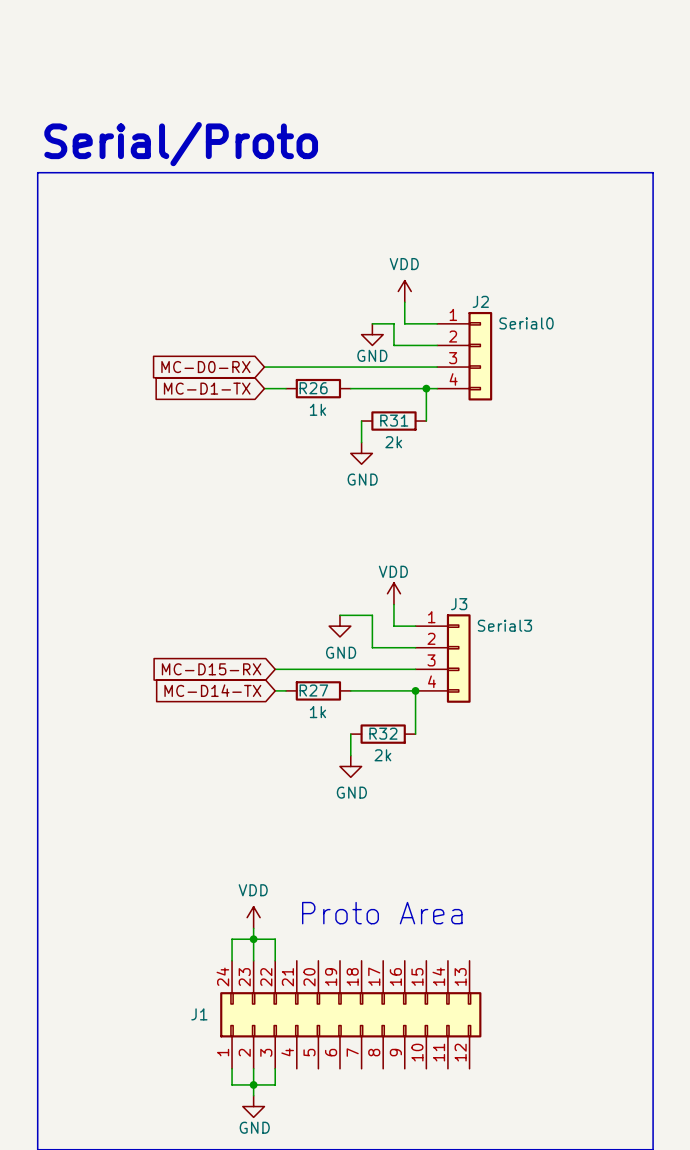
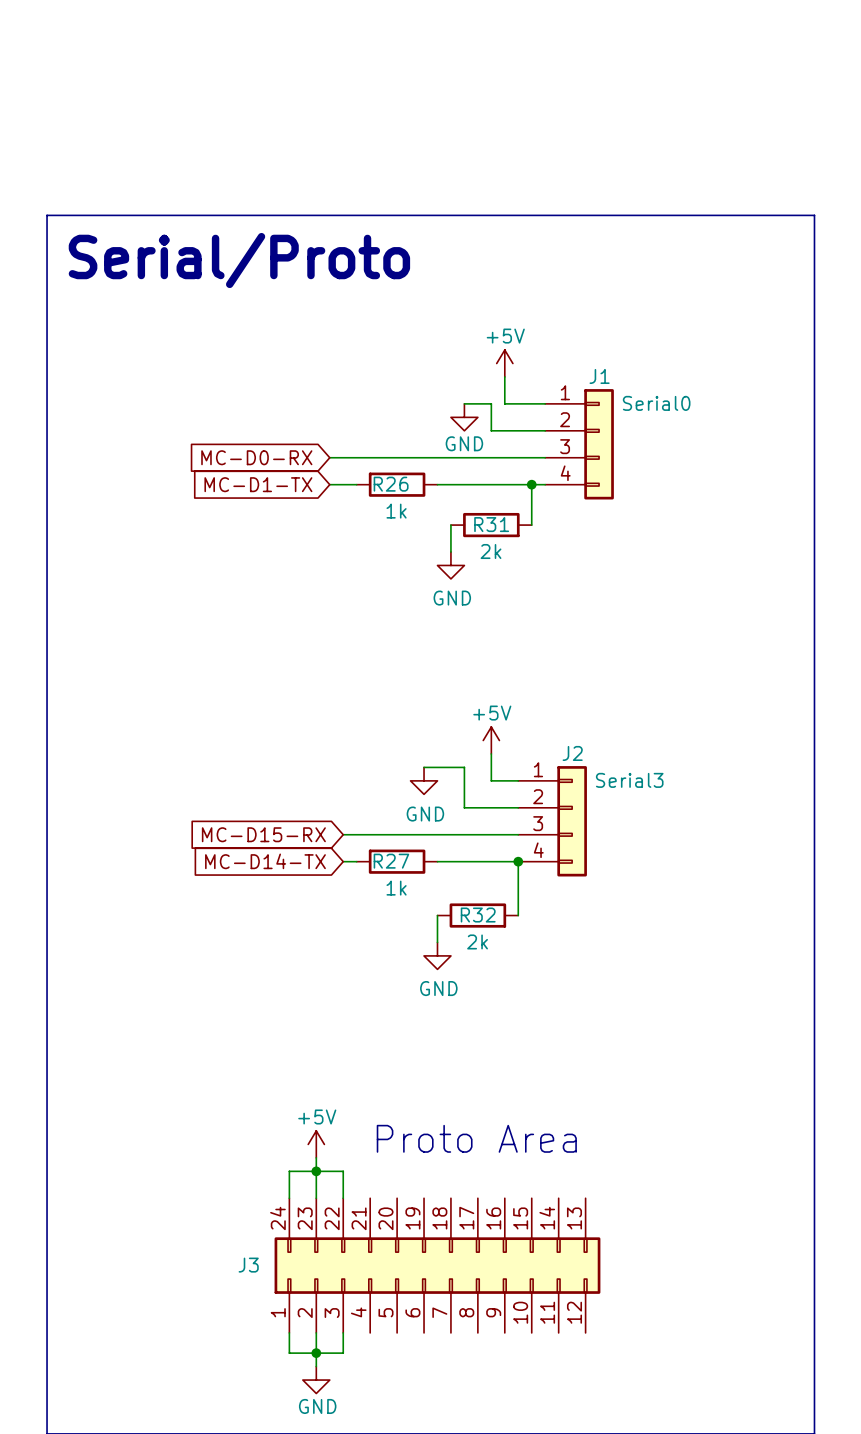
text position: Serial/Proto (181, 144) -> Serial/Proto (239, 260)
power symbol: VDD (404, 291) -> +5V (504, 363)
J2 name: J2 (480, 301) -> J1 (599, 376)
power symbol: VDD (393, 593) -> +5V (491, 740)
J3 name: J3 (459, 604) -> J2 (572, 753)
power symbol: VDD (253, 917) -> +5V (316, 1144)
J1 name: J1 (199, 1014) -> J3 (248, 1265)

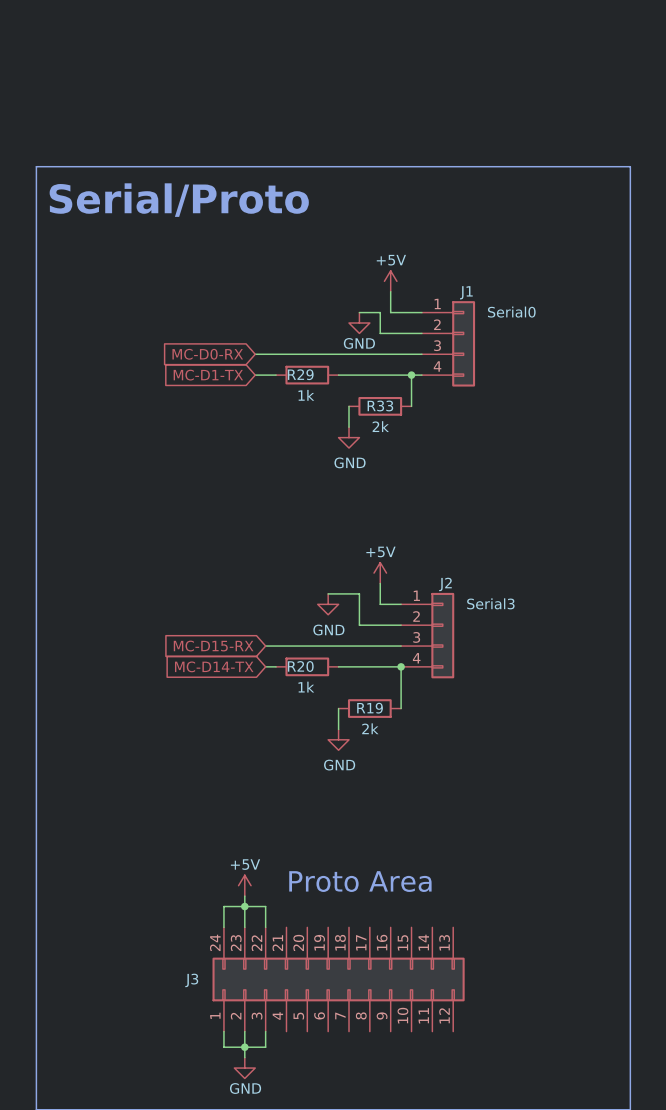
R26 name: R26 (391, 484) -> R29 (300, 374)
R31 name: R31 (491, 524) -> R33 (380, 405)
R27 name: R27 (391, 861) -> R20 (300, 666)
R32 name: R32 (478, 915) -> R19 (370, 708)

